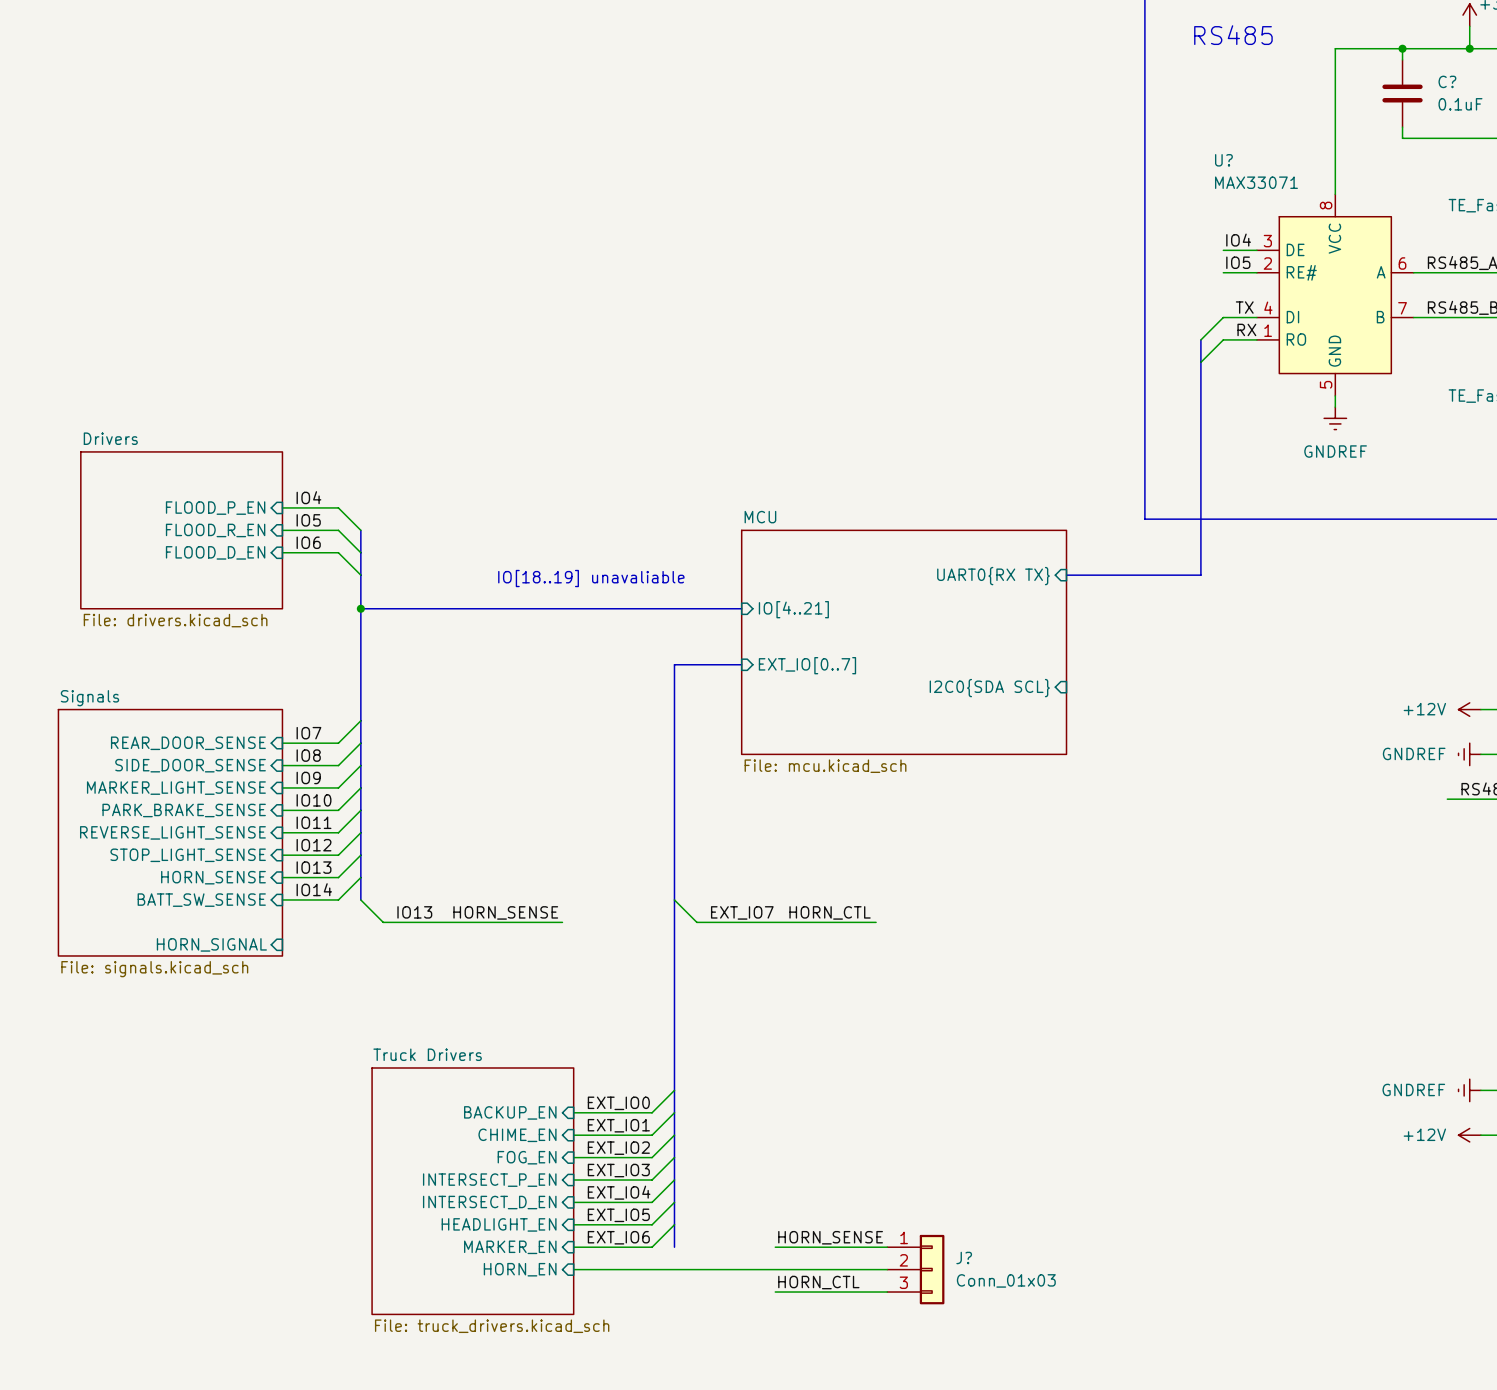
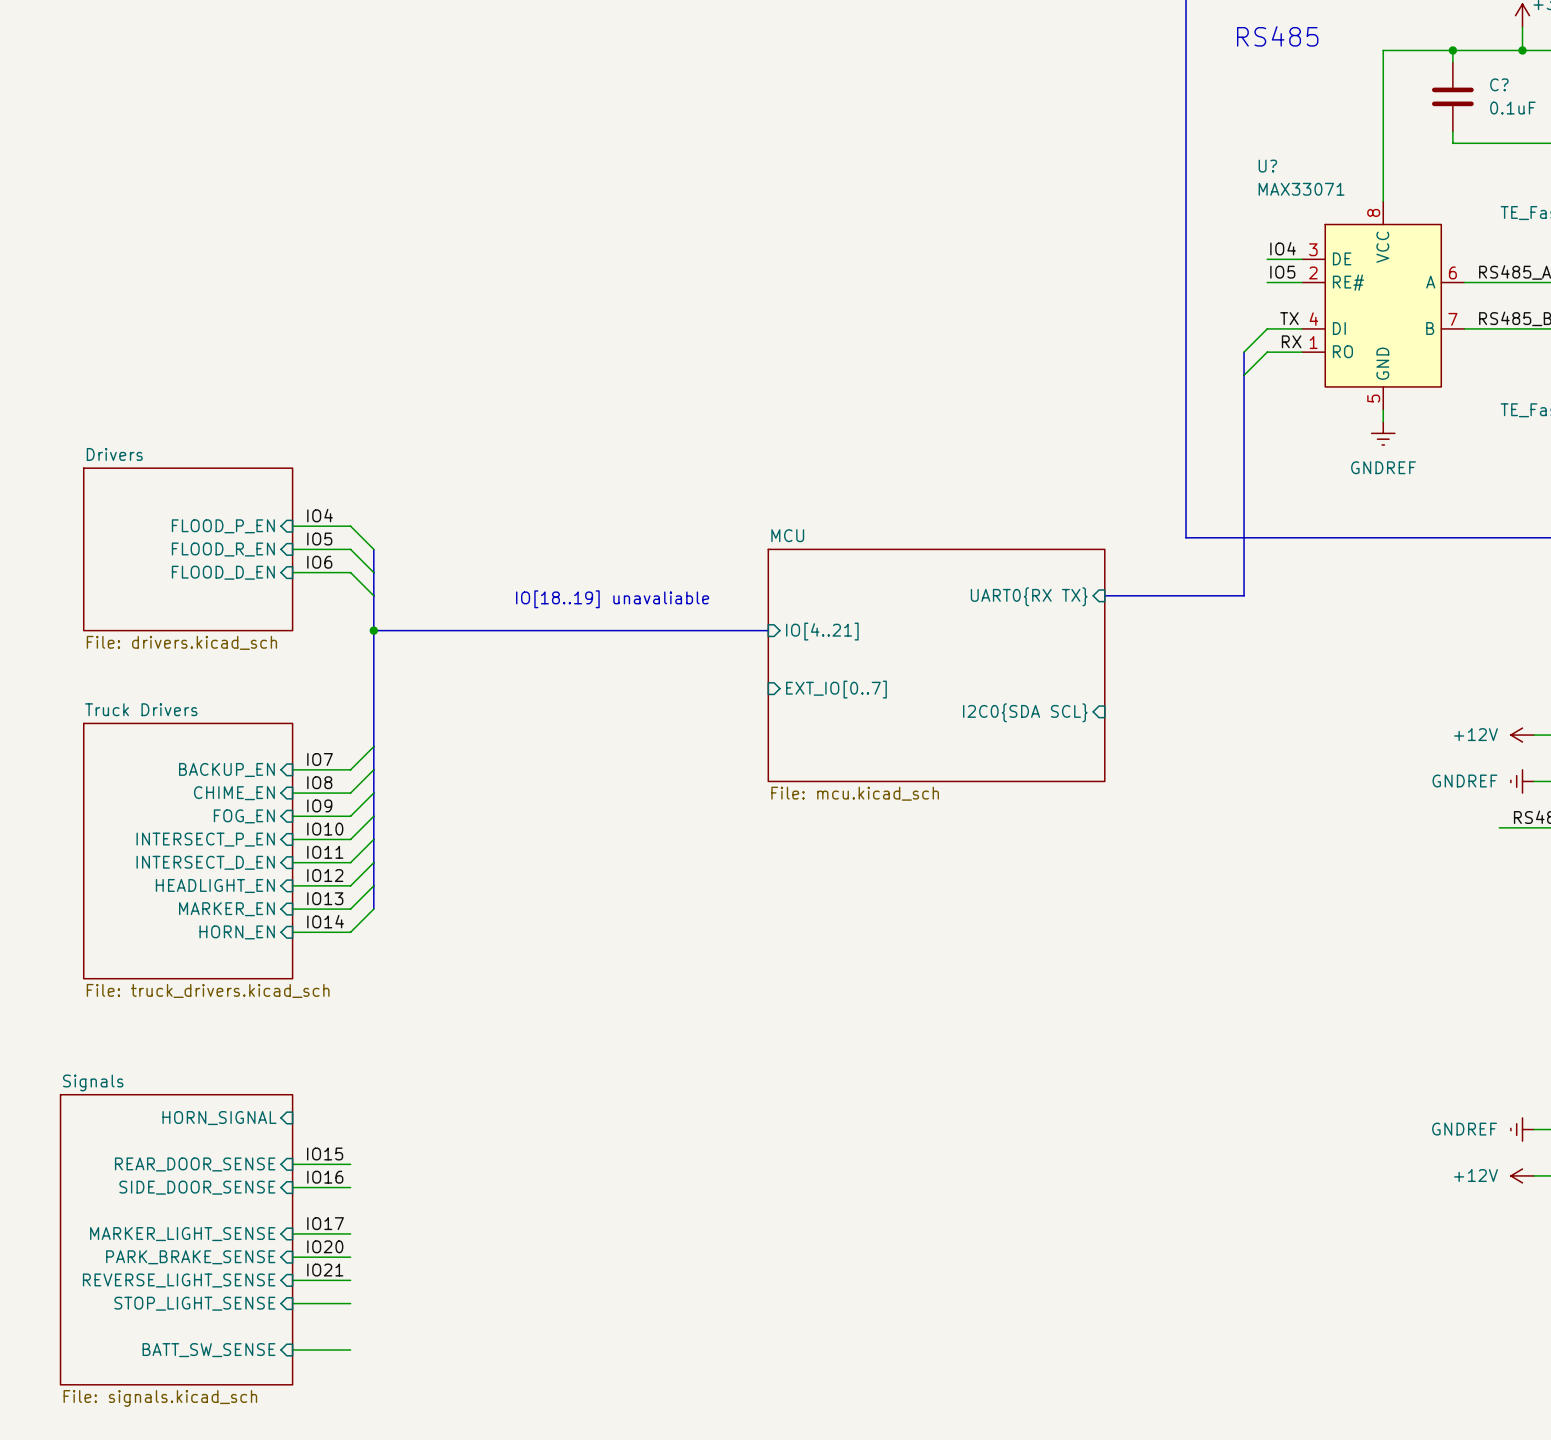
bus: (741, 664) (674, 664) (674, 1247) -> none
sheet pin: REAR_DOOR_SENSE (188, 743) -> BACKUP_EN (226, 769)
sheet pin: SIDE_DOOR_SENSE (190, 765) -> CHIME_EN (234, 793)
sheet pin: MARKER_LIGHT_SENSE (176, 788) -> FOG_EN (244, 816)
sheet pin: PARK_BRAKE_SENSE (184, 810) -> INTERSECT_P_EN (205, 839)
sheet Truck Drivers: none -> File: truck_drivers.kicad_sch (188, 851)
sheet Signals: File: signals.kicad_sch (170, 832) -> none
sheet pin: REVERSE_LIGHT_SENSE (172, 832) -> INTERSECT_D_EN (205, 862)
sheet pin: STOP_LIGHT_SENSE (188, 855) -> HEADLIGHT_EN (215, 886)
sheet pin: HORN_SENSE (213, 877) -> MARKER_EN (226, 909)
bus: (360, 877) (360, 899) -> none
wire: (360, 899) (383, 922) (562, 922) -> none
wire: (674, 899) (696, 922) (876, 922) -> none
sheet pin: BATT_SW_SENSE (201, 900) -> HORN_EN (237, 932)
label: IO13 (414, 912) -> none
label: HORN_SENSE (505, 912) -> none
label: EXT_IO7 (742, 912) -> none
label: HORN_CTL (830, 912) -> none
sheet pin position: HORN_SIGNAL (211, 944) -> HORN_SIGNAL (219, 1118)
wire: (674, 1090) (652, 1112) (573, 1112) -> none
label: EXT_IO0 (618, 1103) -> none
sheet pin: BACKUP_EN (510, 1112) -> none
wire: (674, 1112) (652, 1135) (573, 1135) -> none
label: none -> IO15 (325, 1153)
sheet pin: none -> REAR_DOOR_SENSE (195, 1164)
wire: none -> (292, 1164) (350, 1164)
label: EXT_IO1 (618, 1125) -> none
sheet pin: CHIME_EN (517, 1135) -> none
wire: (674, 1135) (652, 1157) (573, 1157) -> none
label: none -> IO16 (325, 1177)
sheet pin: none -> SIDE_DOOR_SENSE (197, 1187)
wire: none -> (292, 1187) (350, 1187)
label: EXT_IO2 (618, 1148) -> none
sheet pin: FOG_EN (527, 1157) -> none
wire: (674, 1157) (652, 1180) (573, 1180) -> none
label: EXT_IO3 (618, 1170) -> none
sheet pin: INTERSECT_P_EN (489, 1180) -> none
wire: (674, 1180) (652, 1202) (573, 1202) -> none
label: none -> IO17 (325, 1223)
sheet pin: none -> MARKER_LIGHT_SENSE (182, 1234)
wire: none -> (292, 1233) (350, 1233)
sheet Truck Drivers: File: truck_drivers.kicad_sch (472, 1191) -> none
label: EXT_IO4 (619, 1192) -> none
sheet Signals: none -> File: signals.kicad_sch (176, 1239)
sheet pin: INTERSECT_D_EN (489, 1202) -> none
wire: (674, 1202) (652, 1224) (573, 1224) -> none
label: none -> IO20 (325, 1246)
sheet pin: none -> PARK_BRAKE_SENSE (190, 1257)
wire: none -> (292, 1257) (350, 1257)
label: EXT_IO5 (618, 1215) -> none
sheet pin: HEADLIGHT_EN (499, 1224) -> none
wire: (674, 1224) (652, 1247) (573, 1247) -> none
label: none -> IO21 (325, 1270)
sheet pin: none -> REVERSE_LIGHT_SENSE (179, 1280)
wire: none -> (292, 1280) (350, 1280)
label: EXT_IO6 (618, 1237) -> none
label: HORN_SENSE (830, 1237) -> none
sheet pin: MARKER_EN (510, 1247) -> none
wire: (775, 1247) (887, 1247) -> none
sheet pin: none -> STOP_LIGHT_SENSE (194, 1303)
wire: none -> (292, 1303) (350, 1303)
sheet pin: HORN_EN (520, 1269) -> none
wire: (573, 1269) (887, 1269) -> none
J?: Conn_01x03 (915, 1269) -> none
label: HORN_CTL (818, 1282) -> none
wire: (775, 1292) (887, 1292) -> none
sheet pin: none -> BATT_SW_SENSE (208, 1350)
wire: none -> (292, 1349) (350, 1349)

